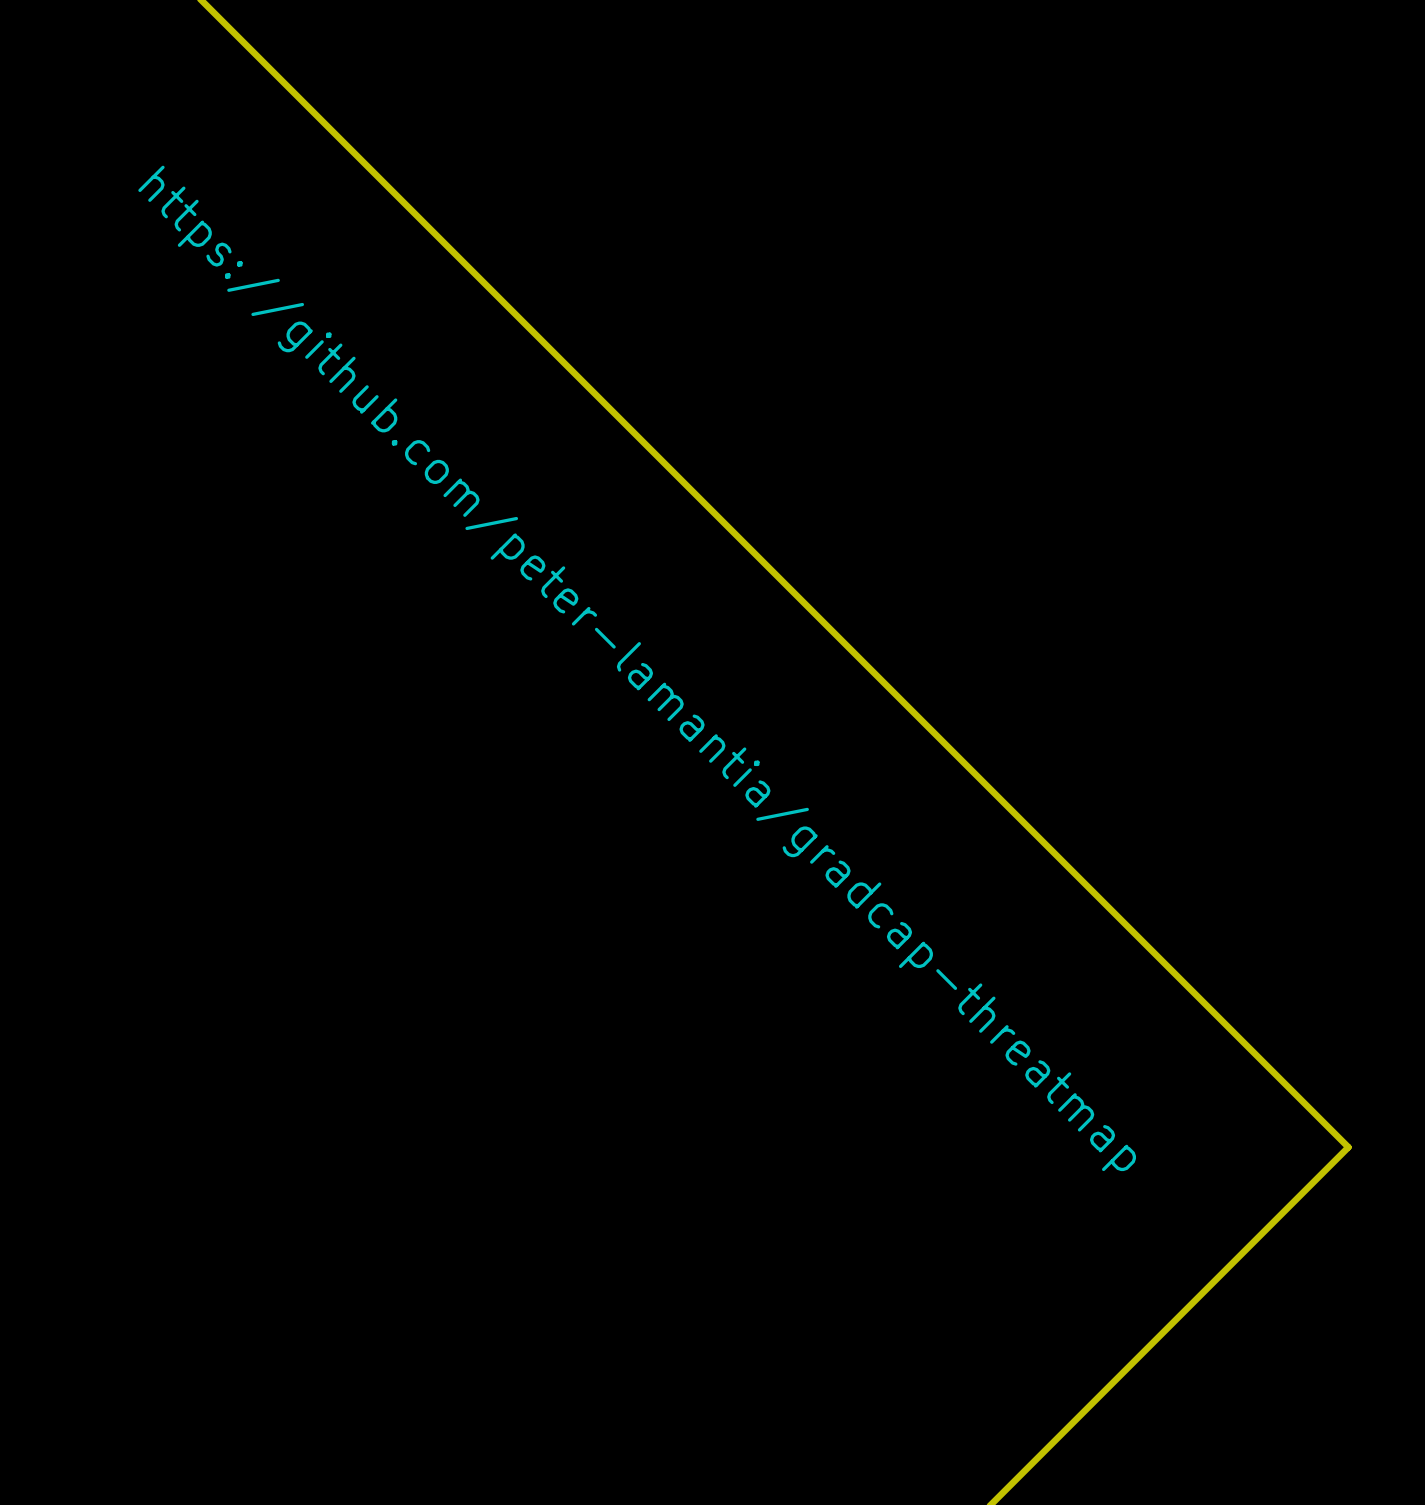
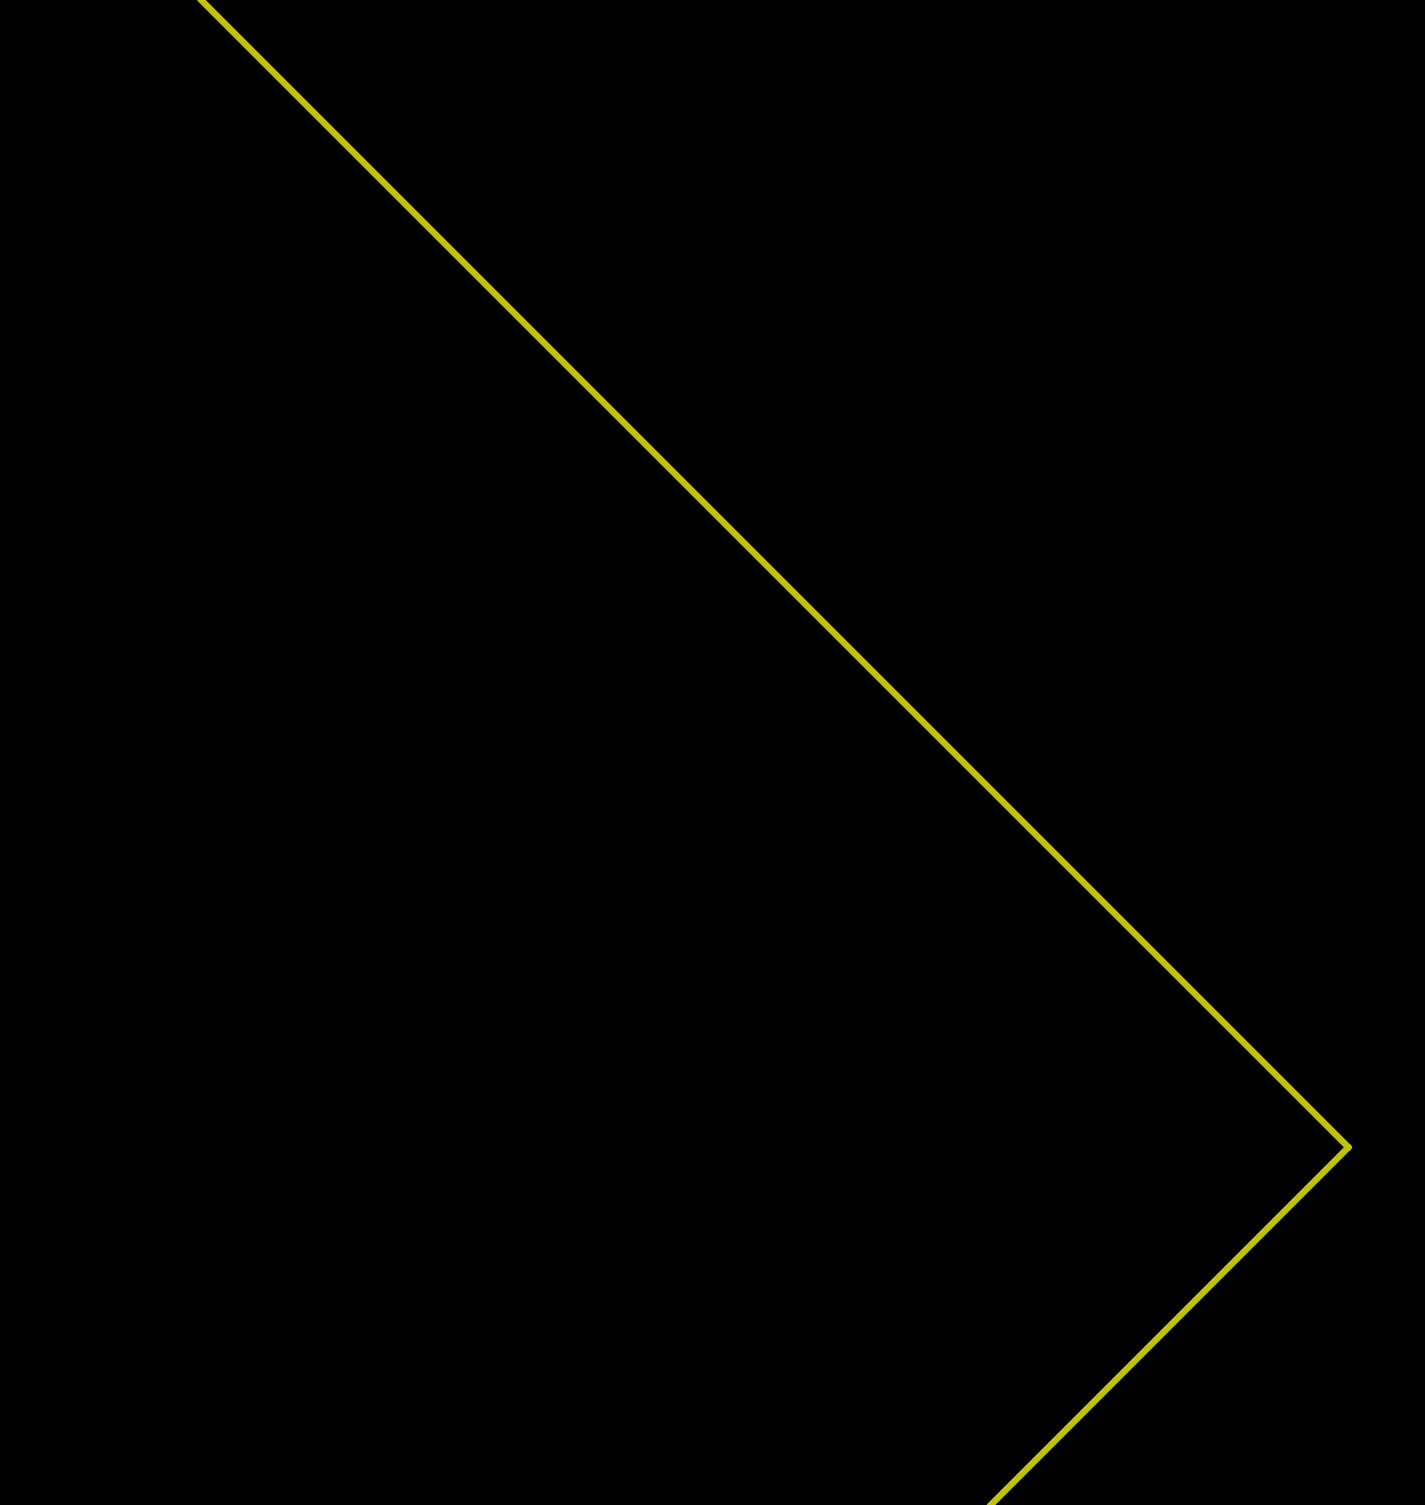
text: https://github.com/peter-lamantia/gradcap-threatmap (637, 668) -> none

